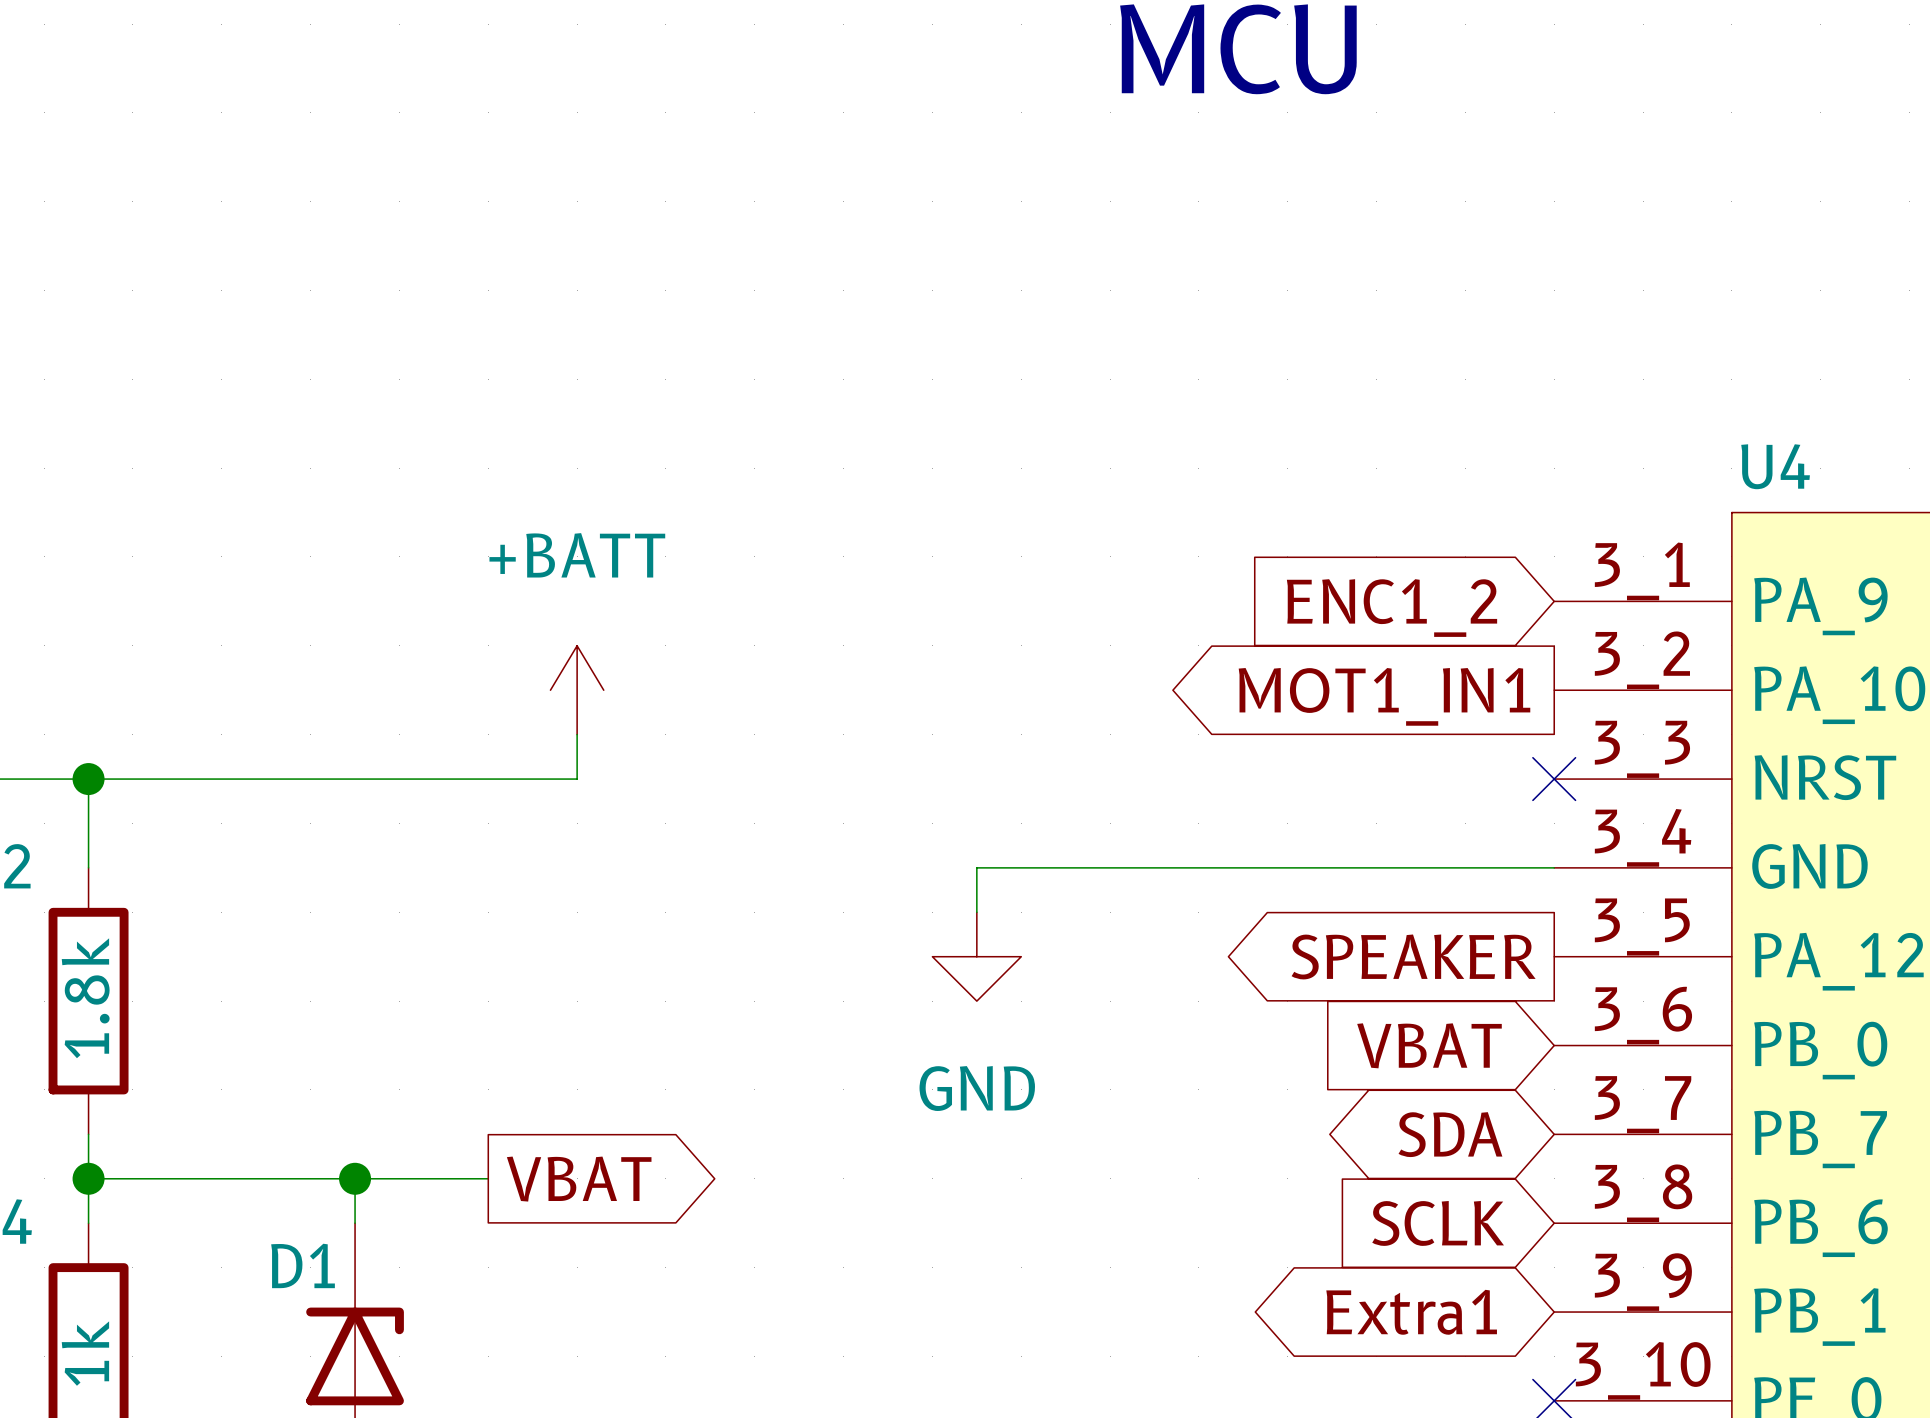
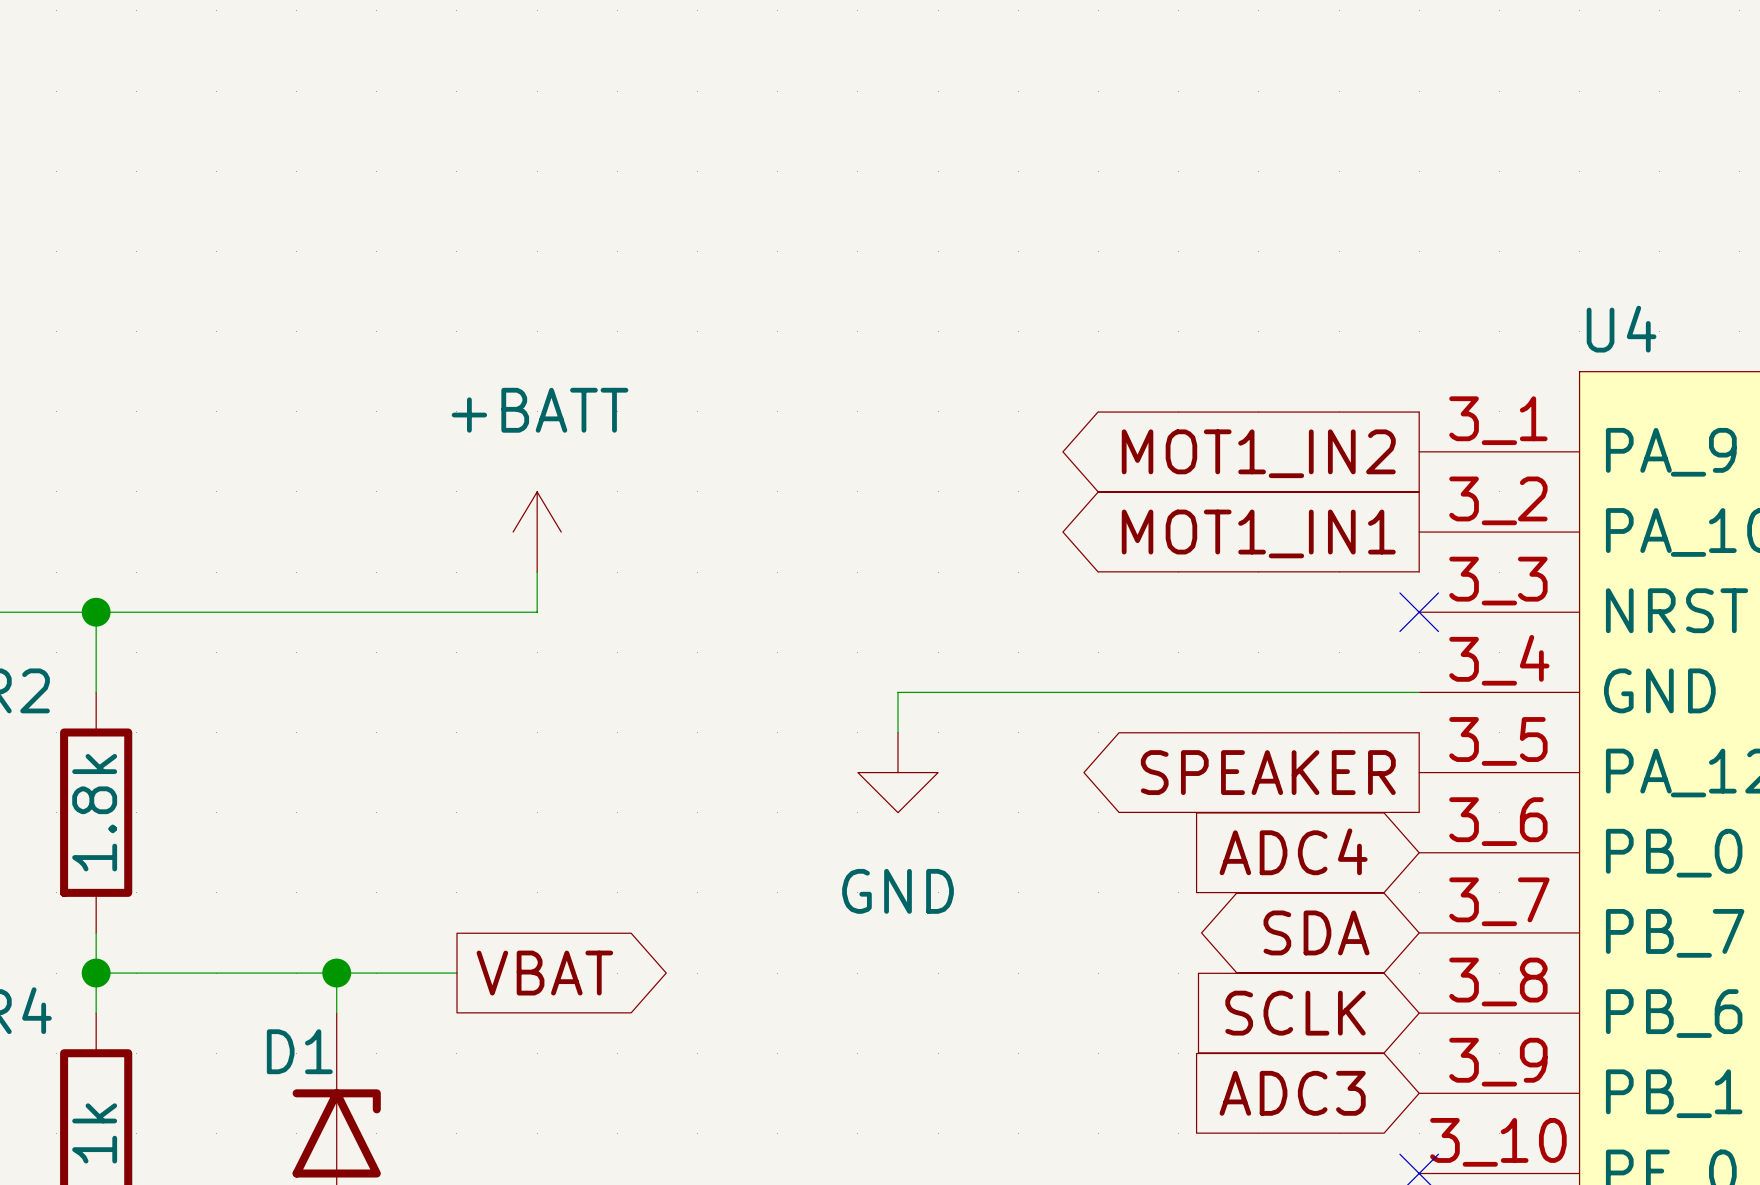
global label shape: input (1392, 608) -> output (1258, 453)
global label: ENC1_2 (1392, 608) -> MOT1_IN2 (1258, 453)
global label: VBAT (1429, 1045) -> ADC4 (1293, 851)
global label shape: bidirectional (1411, 1312) -> input (1292, 1093)
global label: Extra1 (1411, 1312) -> ADC3 (1292, 1093)

